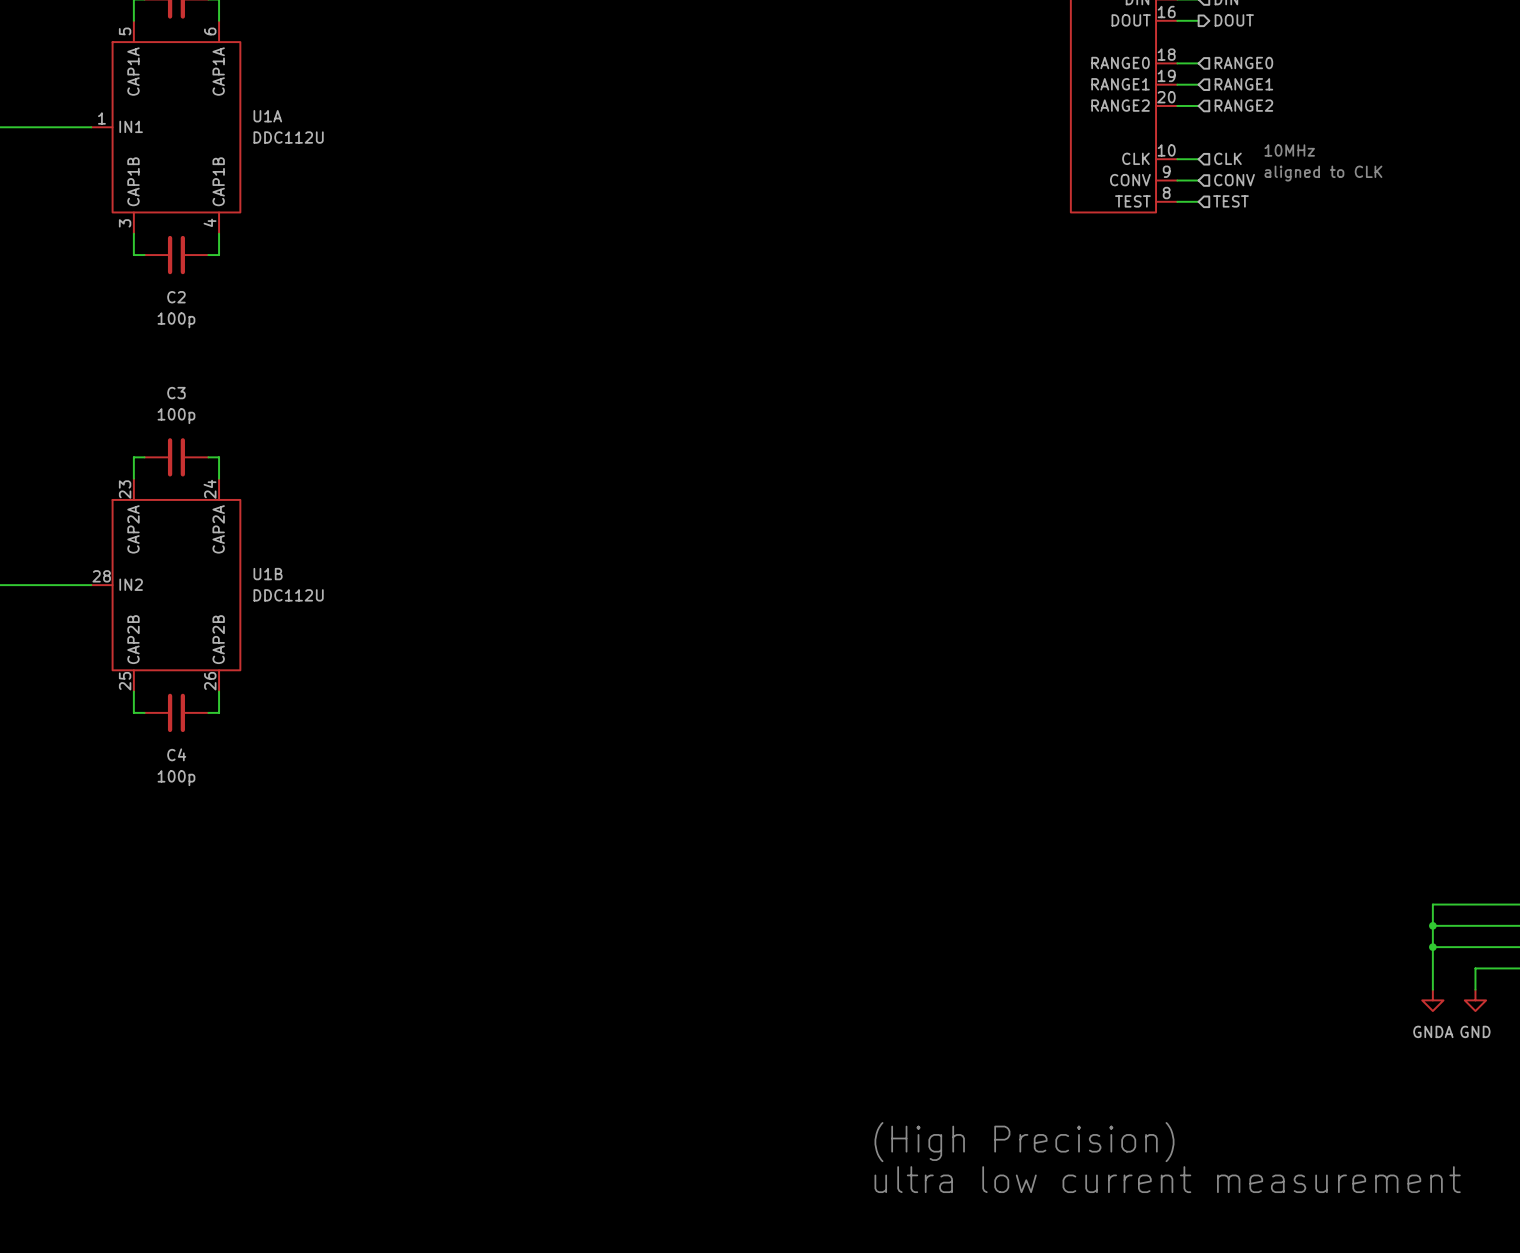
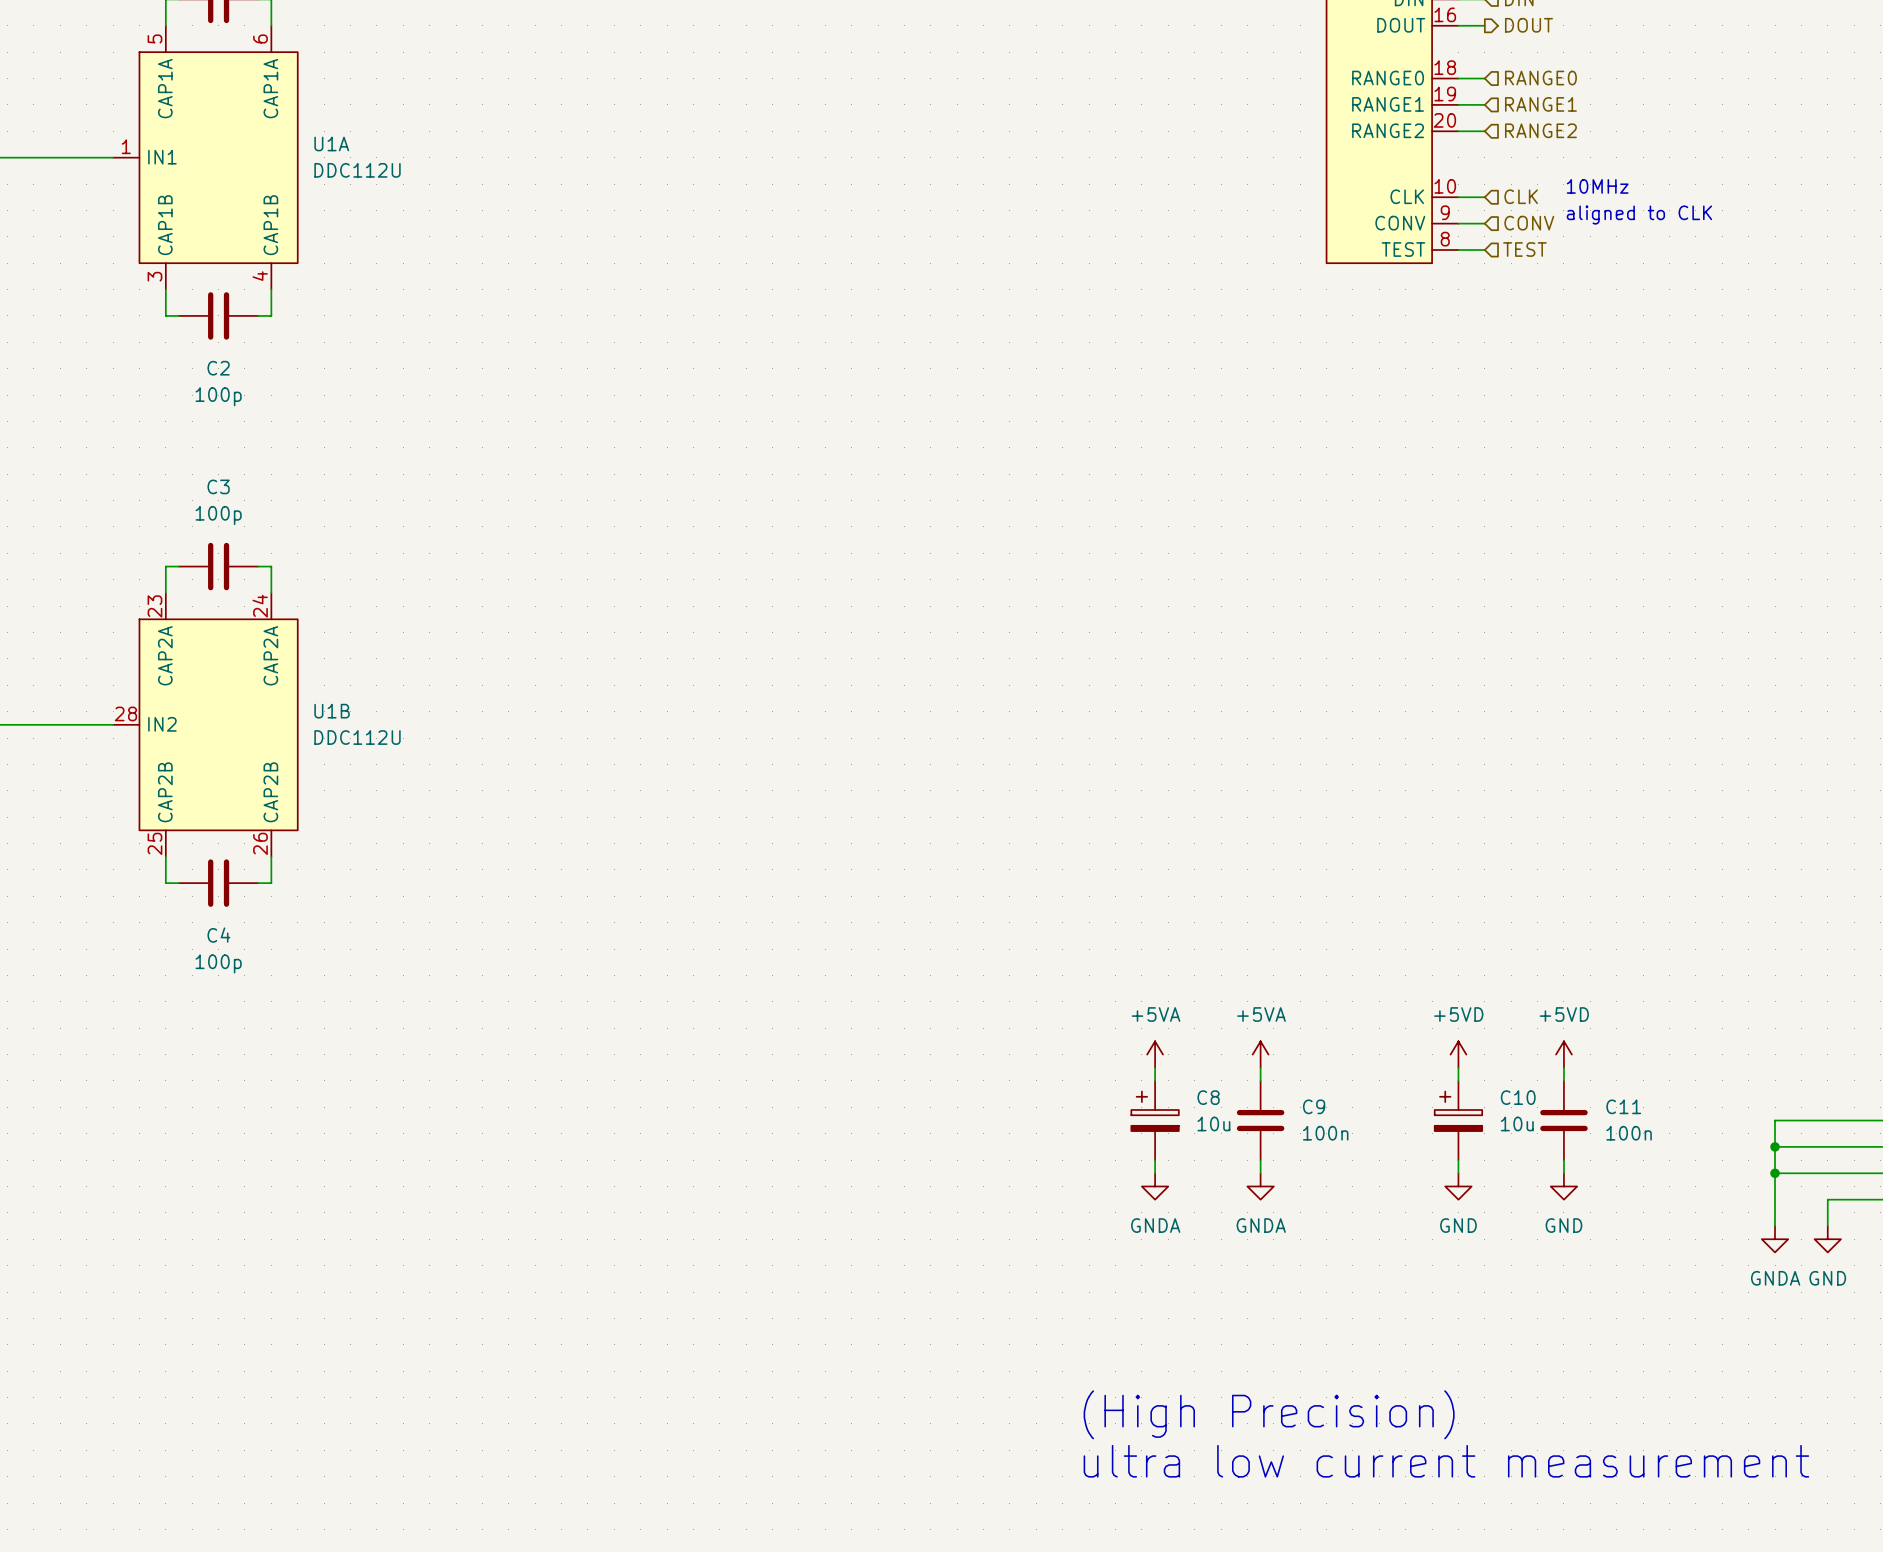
power symbol: none -> +5VA (1155, 1054)
power symbol: none -> +5VA (1260, 1054)
power symbol: none -> +5VD (1458, 1054)
power symbol: none -> +5VD (1563, 1054)
wire: none -> (1155, 1067) (1155, 1080)
wire: none -> (1260, 1067) (1260, 1080)
wire: none -> (1458, 1067) (1458, 1080)
wire: none -> (1563, 1067) (1563, 1080)
C8: none -> 10u (1155, 1120)
C9: none -> 100n (1260, 1120)
C10: none -> 10u (1458, 1120)
C11: none -> 100n (1563, 1120)
wire: none -> (1155, 1160) (1155, 1173)
wire: none -> (1260, 1160) (1260, 1173)
wire: none -> (1458, 1160) (1458, 1173)
wire: none -> (1563, 1160) (1563, 1173)
power symbol: none -> GNDA (1155, 1186)
power symbol: none -> GNDA (1260, 1186)
power symbol: none -> GND (1458, 1186)
power symbol: none -> GND (1563, 1186)

